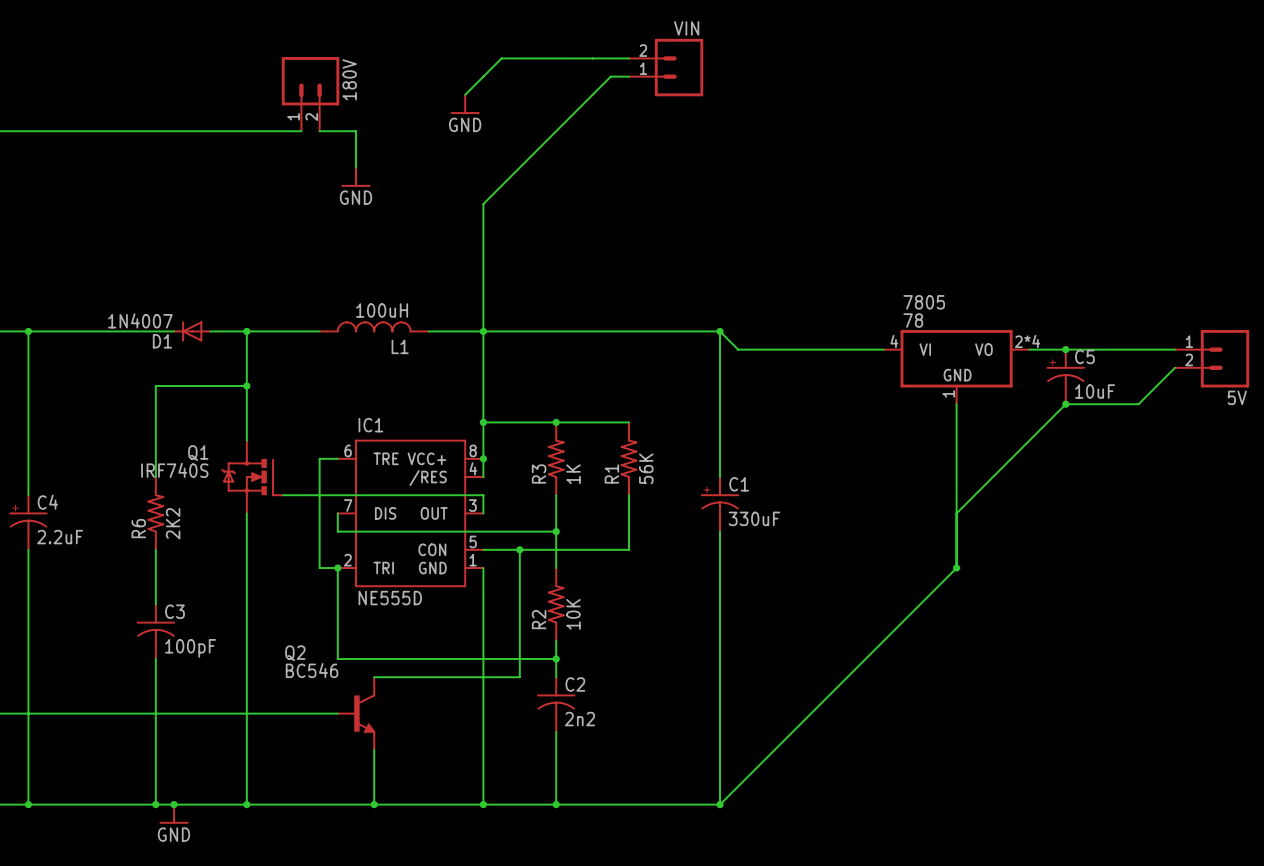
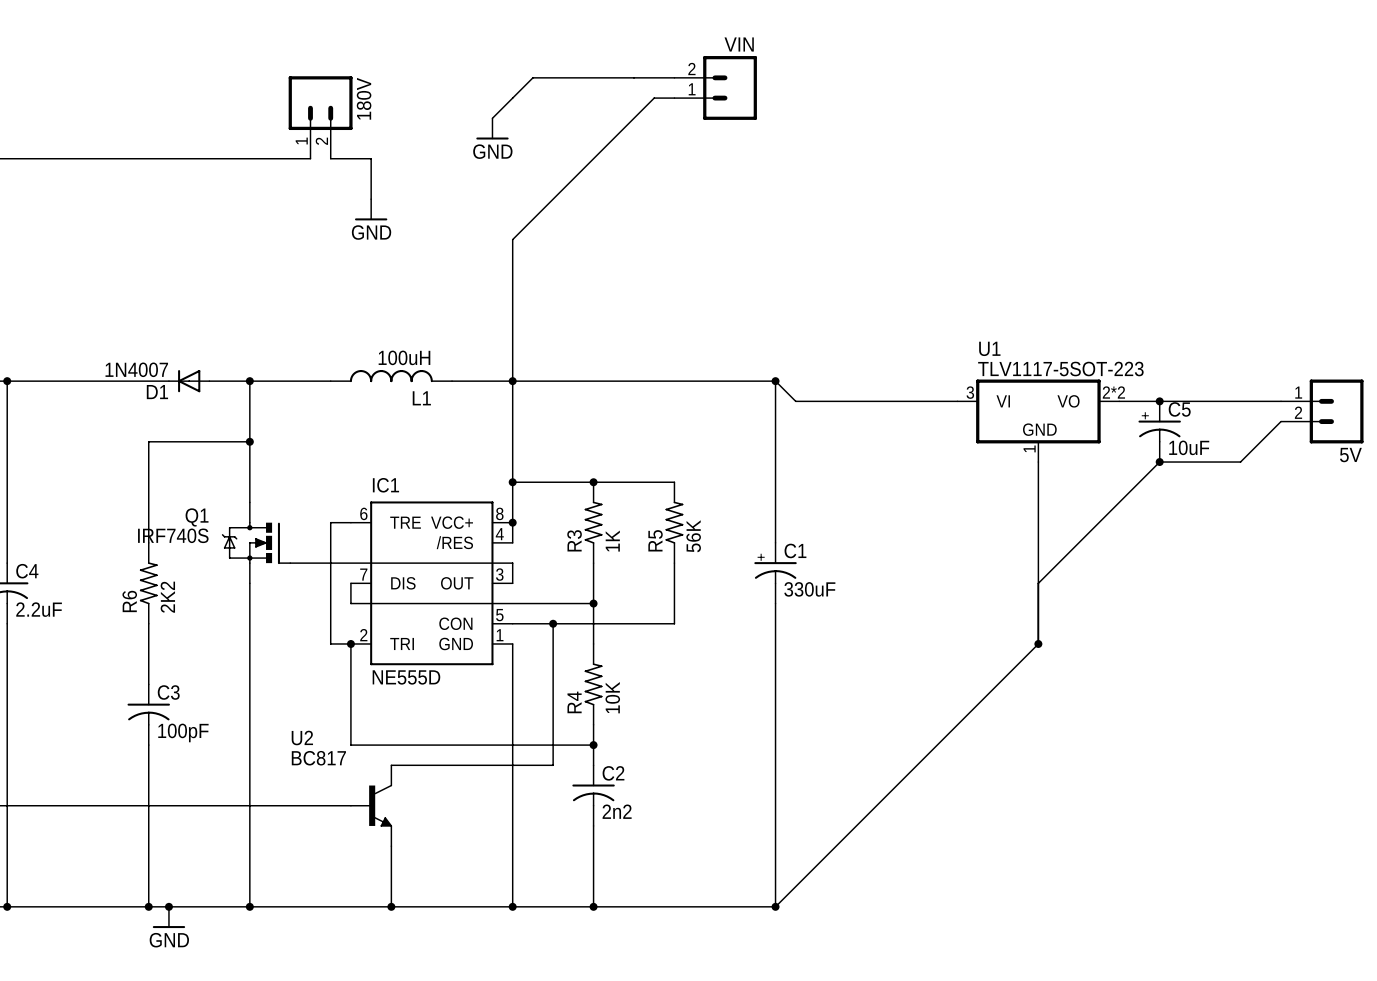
7805 name: 7805 (924, 302) -> U1 (989, 348)
7805 value: 78 (913, 320) -> TLV1117-5SOT-223 (1060, 369)
7805 pin number: 4 (894, 341) -> 3 (970, 392)
7805 pin number: 2*4 (1027, 341) -> 2*2 (1113, 392)
R1 name: R1 (611, 473) -> R5 (655, 540)
R2 name: R2 (539, 619) -> R4 (574, 702)
Q2 name: Q2 (295, 653) -> U2 (302, 738)
Q2 value: BC546 (312, 670) -> BC817 (318, 758)

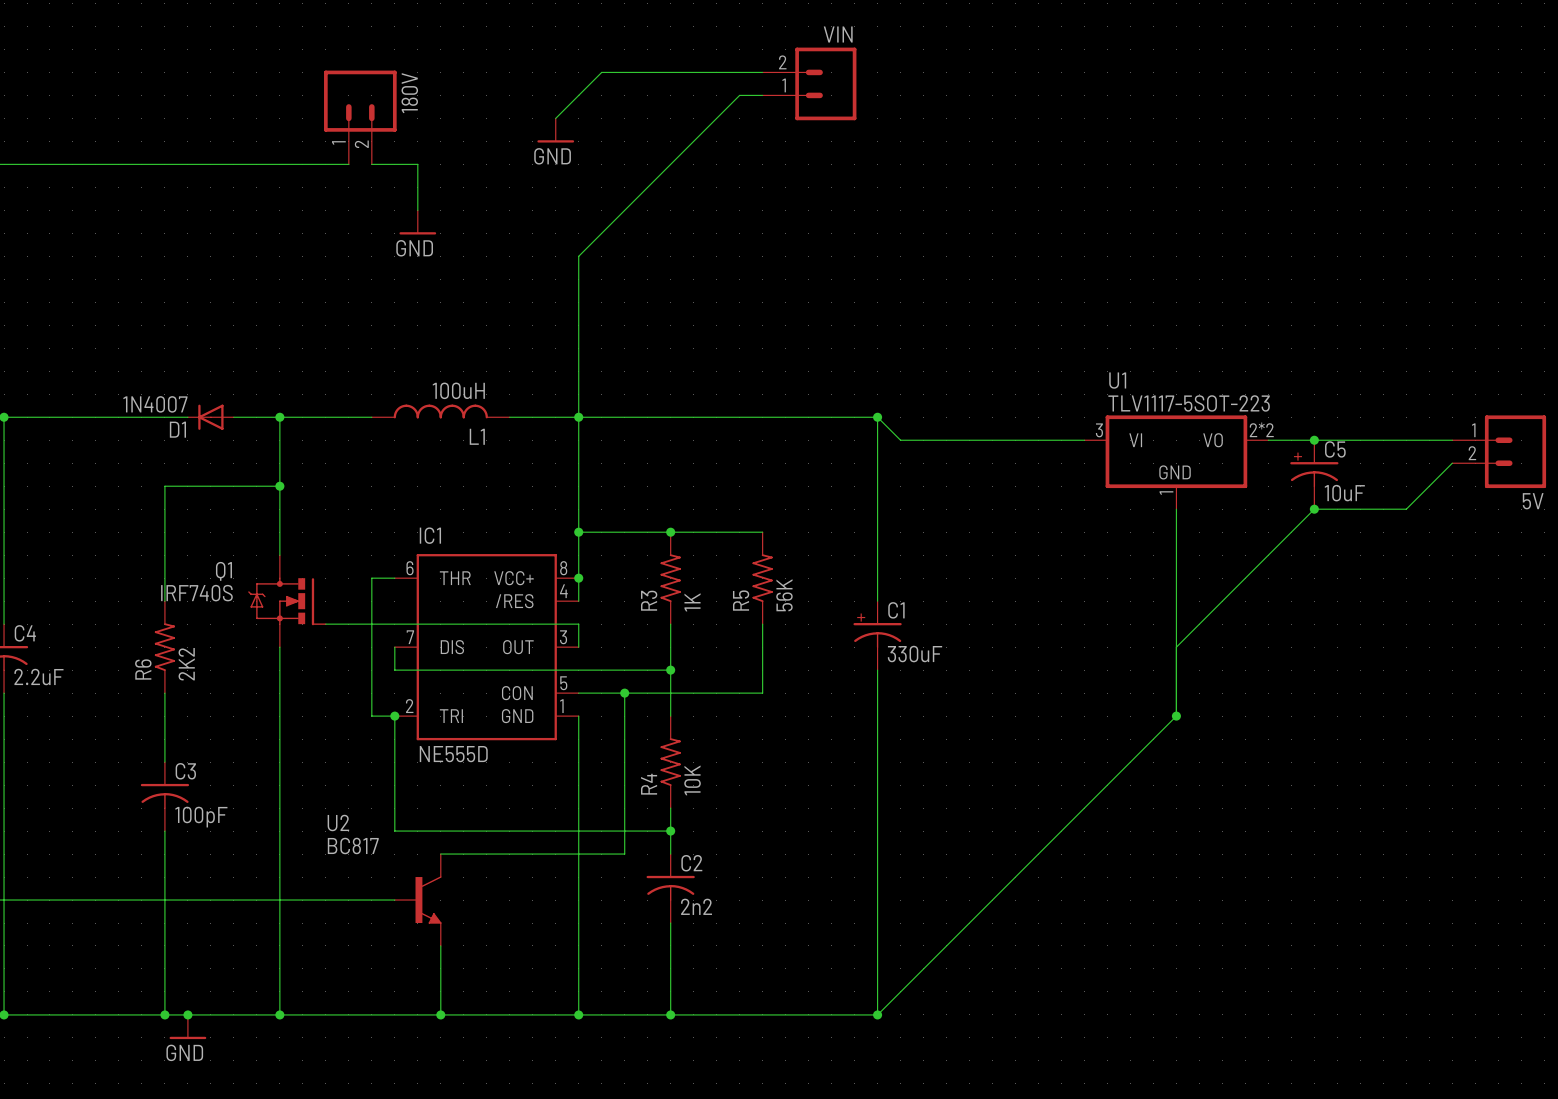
IC1 pin name: TRE (405, 522) -> THR (455, 578)

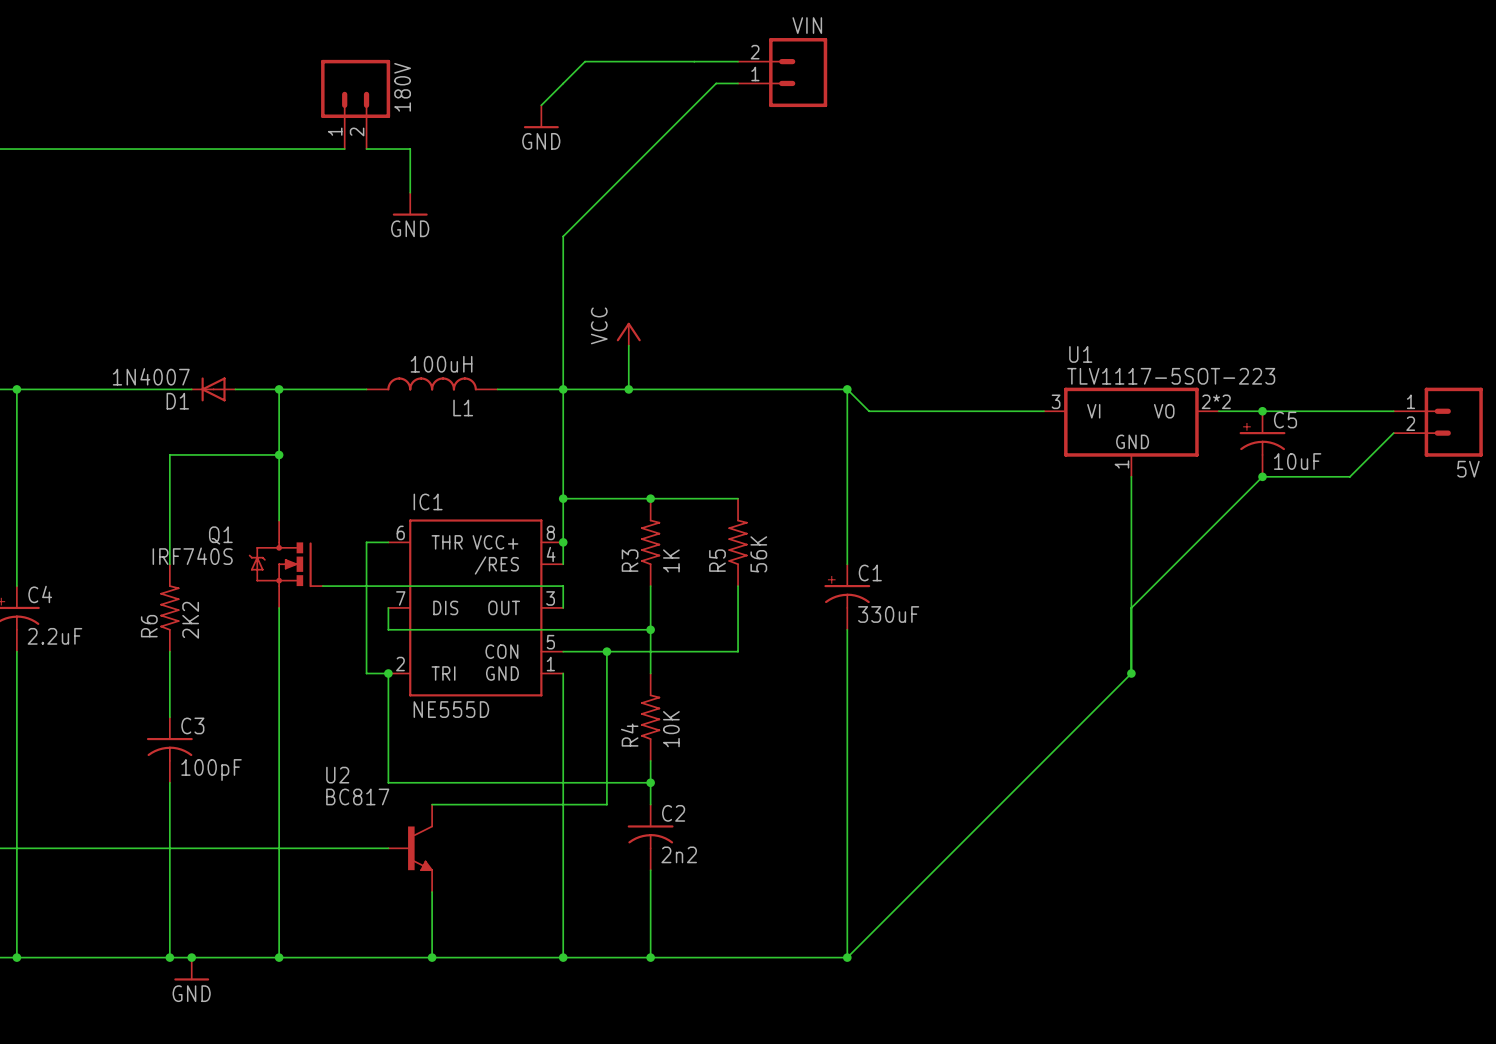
power symbol: none -> VCC (628, 334)
wire: none -> (628, 345) (628, 389)
junction: none -> (628, 389)

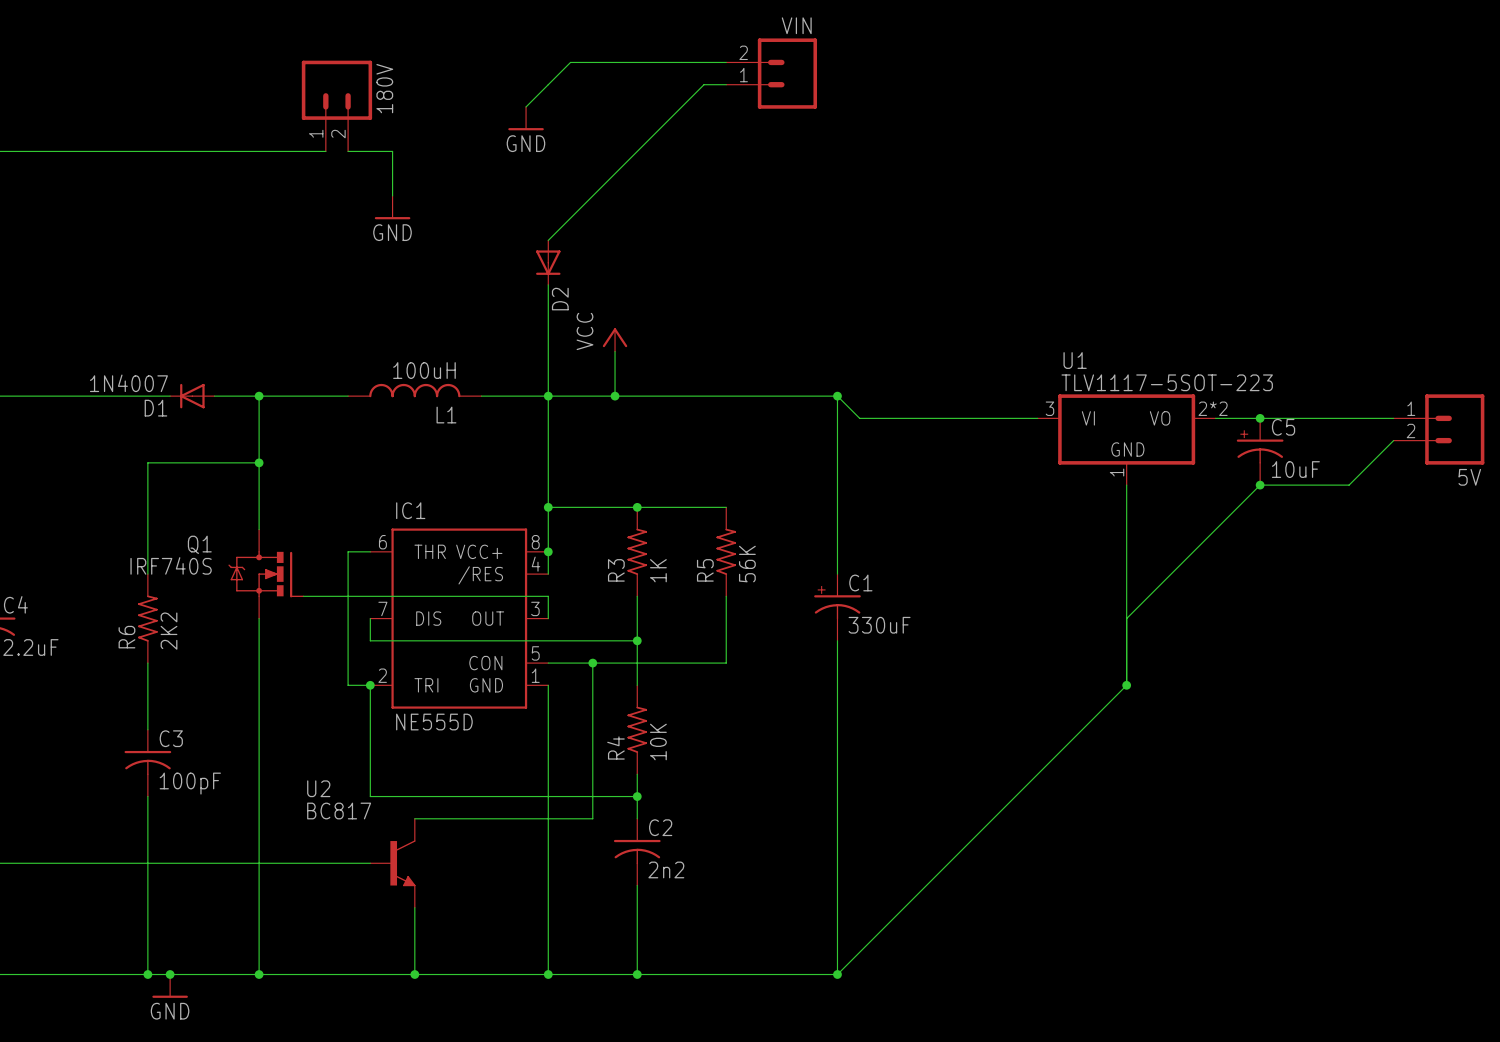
D2: none -> (548, 262)

